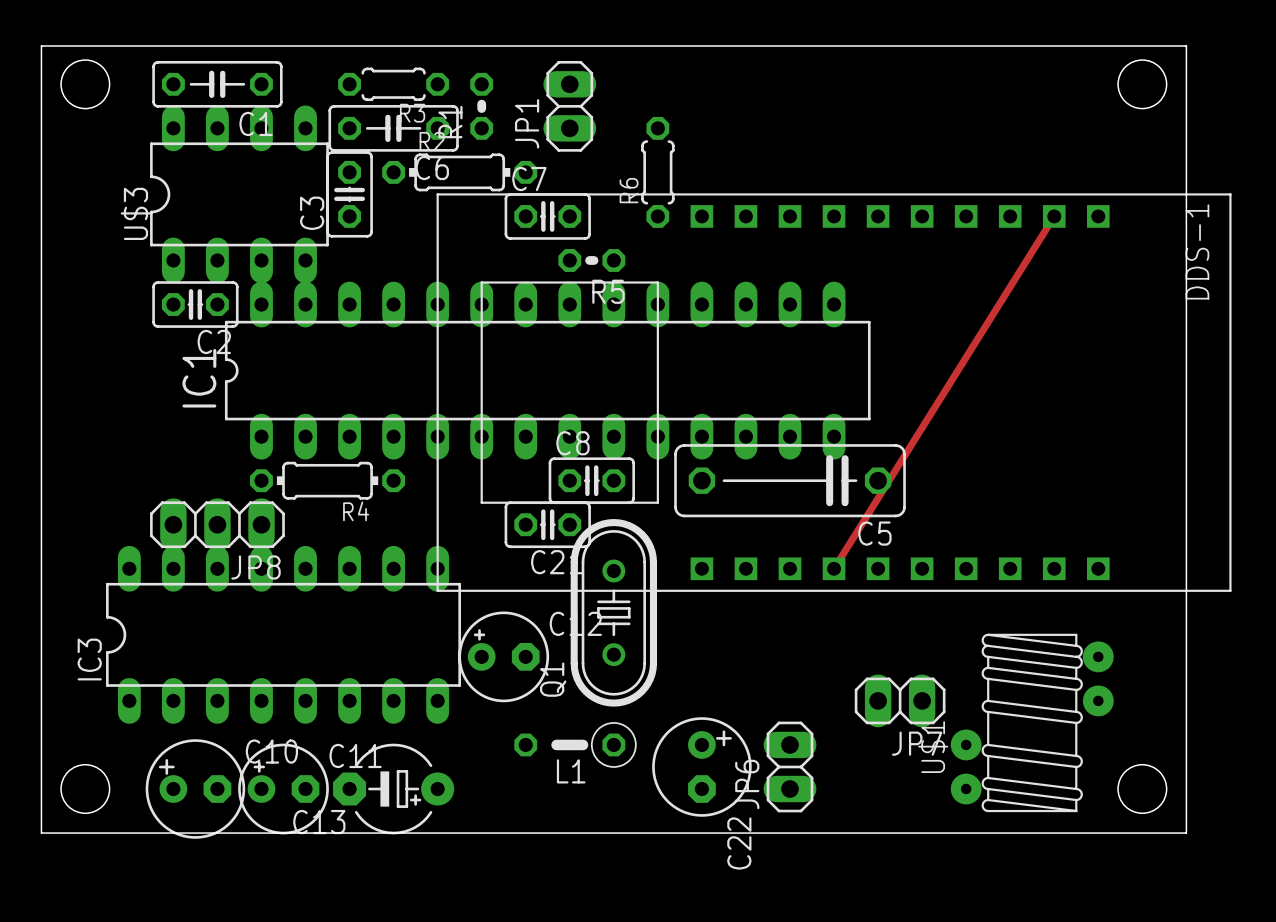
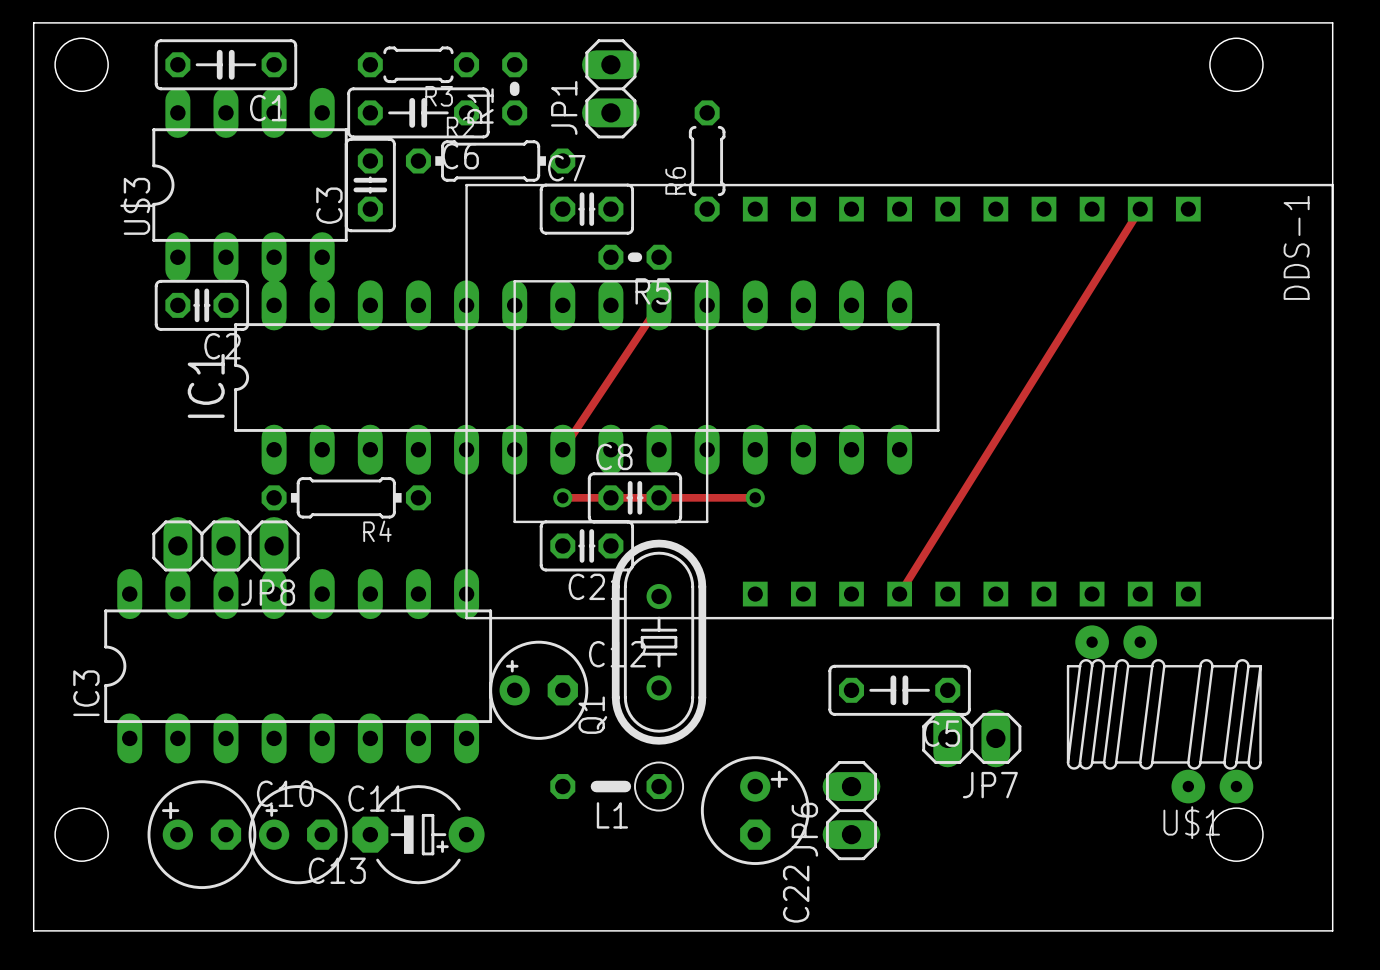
board edge: (1186, 45) (1186, 833) (41, 833) -> (1284, 22) (1332, 22) (1332, 930) (33, 930) (33, 882)
track: none -> (659, 305) (562, 449)
C5 footprint: [674, 444, 906, 518] -> [828, 664, 971, 716]
track: none -> (562, 497) (755, 497)
via: none -> (562, 497)
via: none -> (755, 497)
C5 name position: C5 (874, 533) -> C5 (941, 733)
U$1 rotation: 0° (1032, 722) -> 90° counterclockwise (1164, 714)

